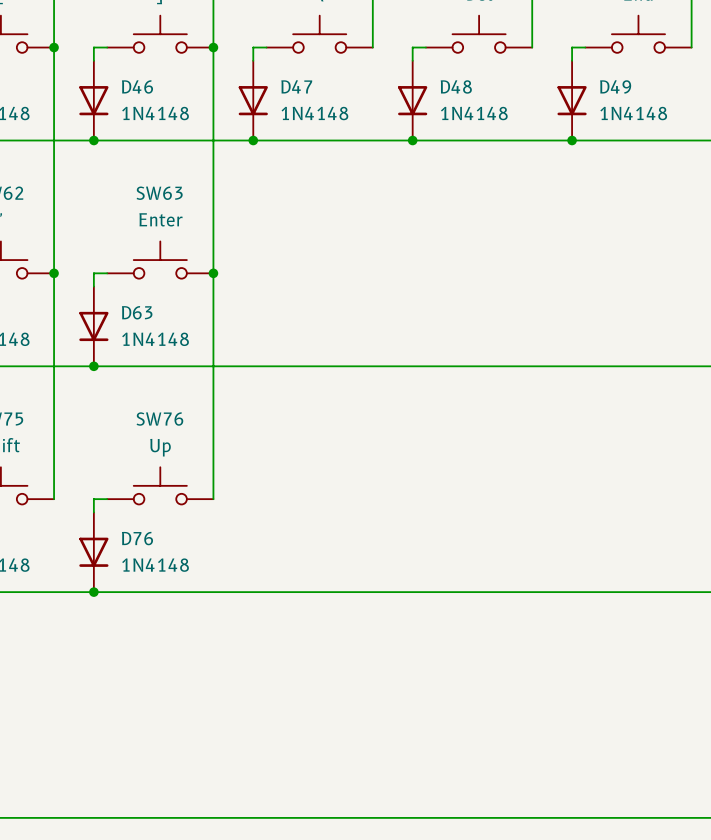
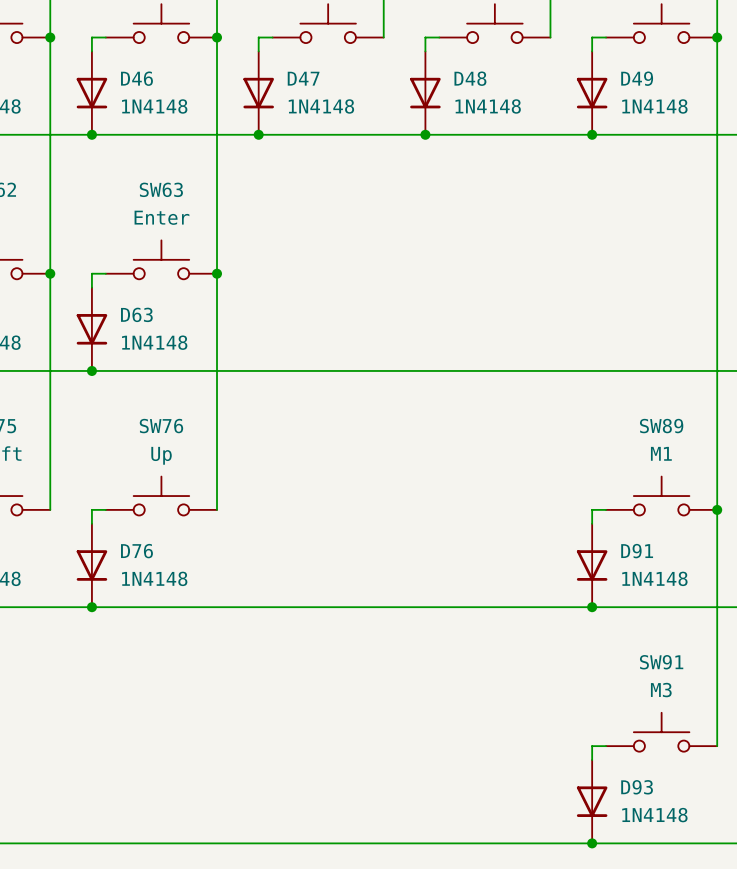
wire: none -> (717, 37) (717, 746)
junction: none -> (717, 37)
SW89: none -> M1 (661, 496)
wire: none -> (606, 509) (592, 509) (592, 523)
junction: none -> (717, 509)
D91: none -> 1N4148 (592, 565)
junction: none -> (592, 607)
SW91: none -> M3 (661, 732)
wire: none -> (606, 746) (592, 746) (592, 760)
D93: none -> 1N4148 (592, 801)
junction: none -> (592, 843)

